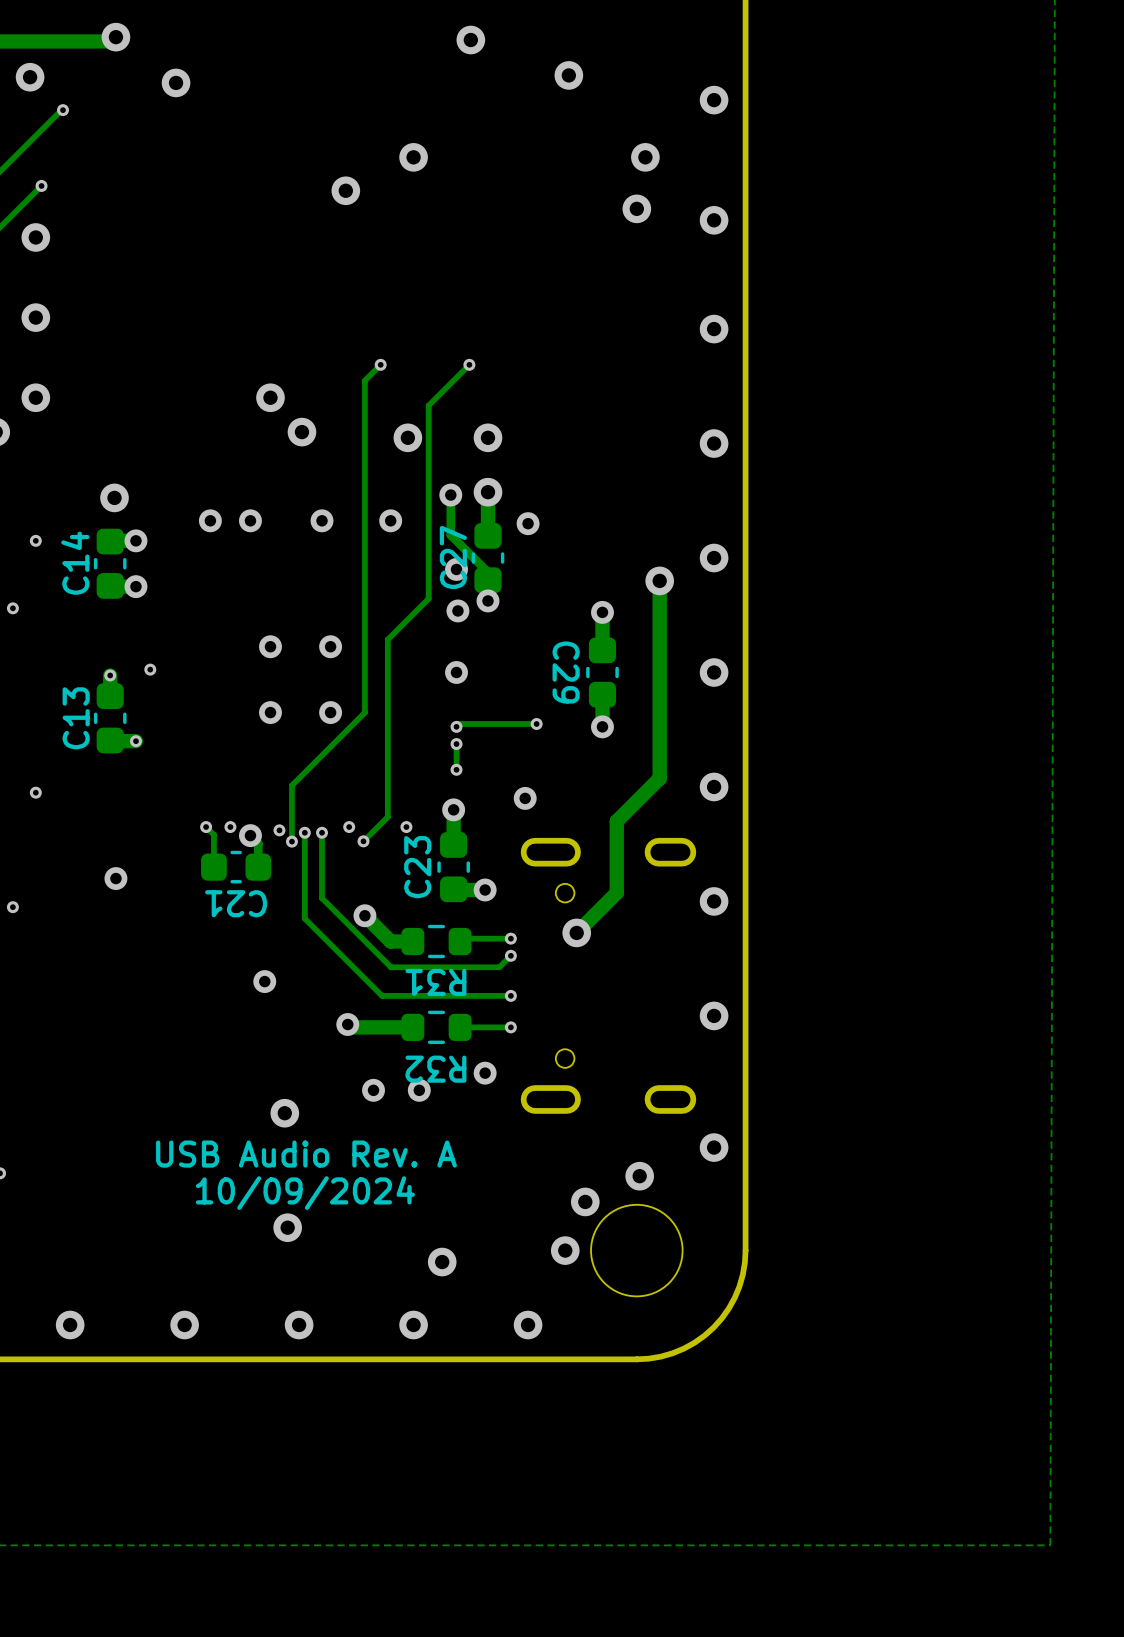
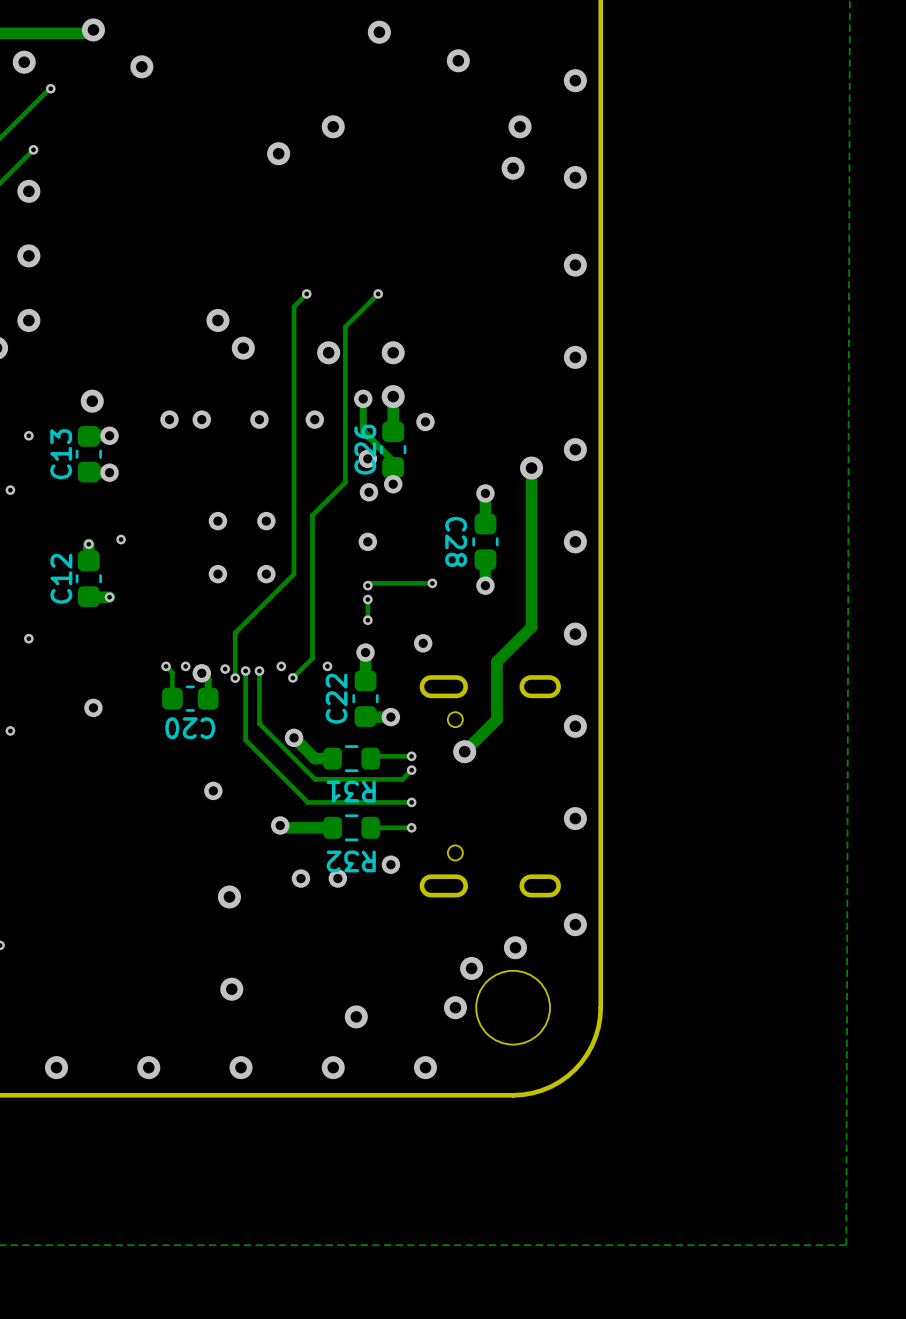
C27 name: C27 (453, 557) -> C26 (365, 449)
C14 name: C14 (75, 563) -> C13 (61, 454)
C29 name: C29 (566, 672) -> C28 (456, 541)
C13 name: C13 (76, 718) -> C12 (61, 578)
C23 name: C23 (417, 867) -> C22 (336, 698)
C21 name: C21 (236, 903) -> C20 (190, 728)
text: USB Audio Rev. A (306, 1154) -> none
text: 10/09/2024 (305, 1193) -> none

